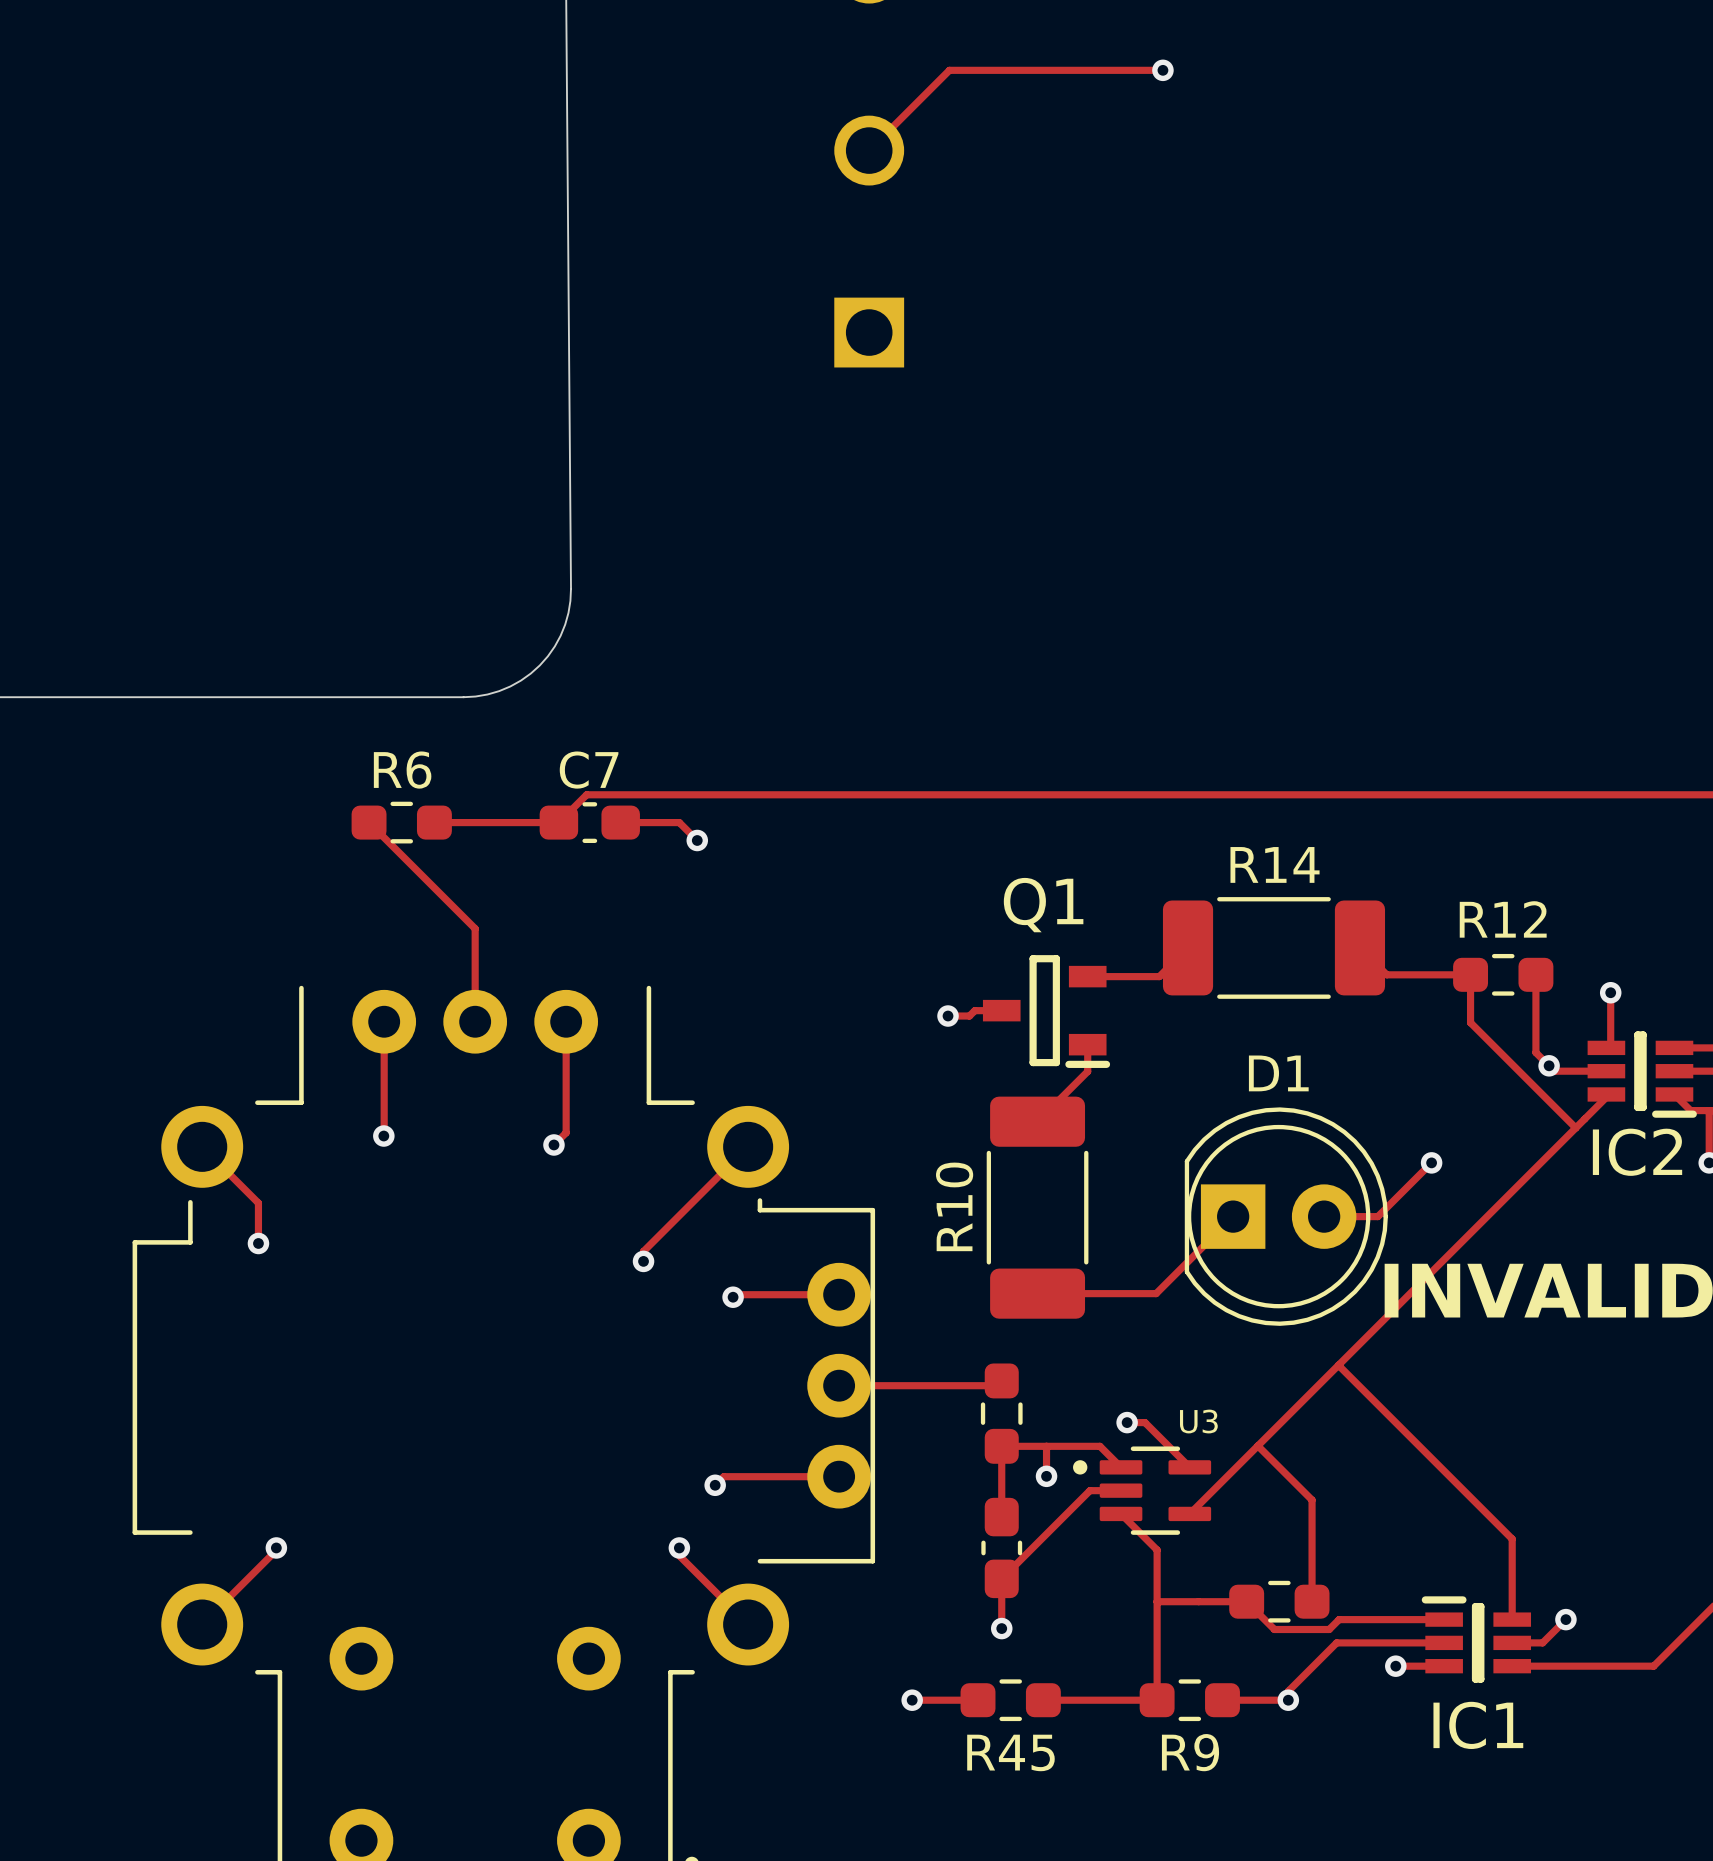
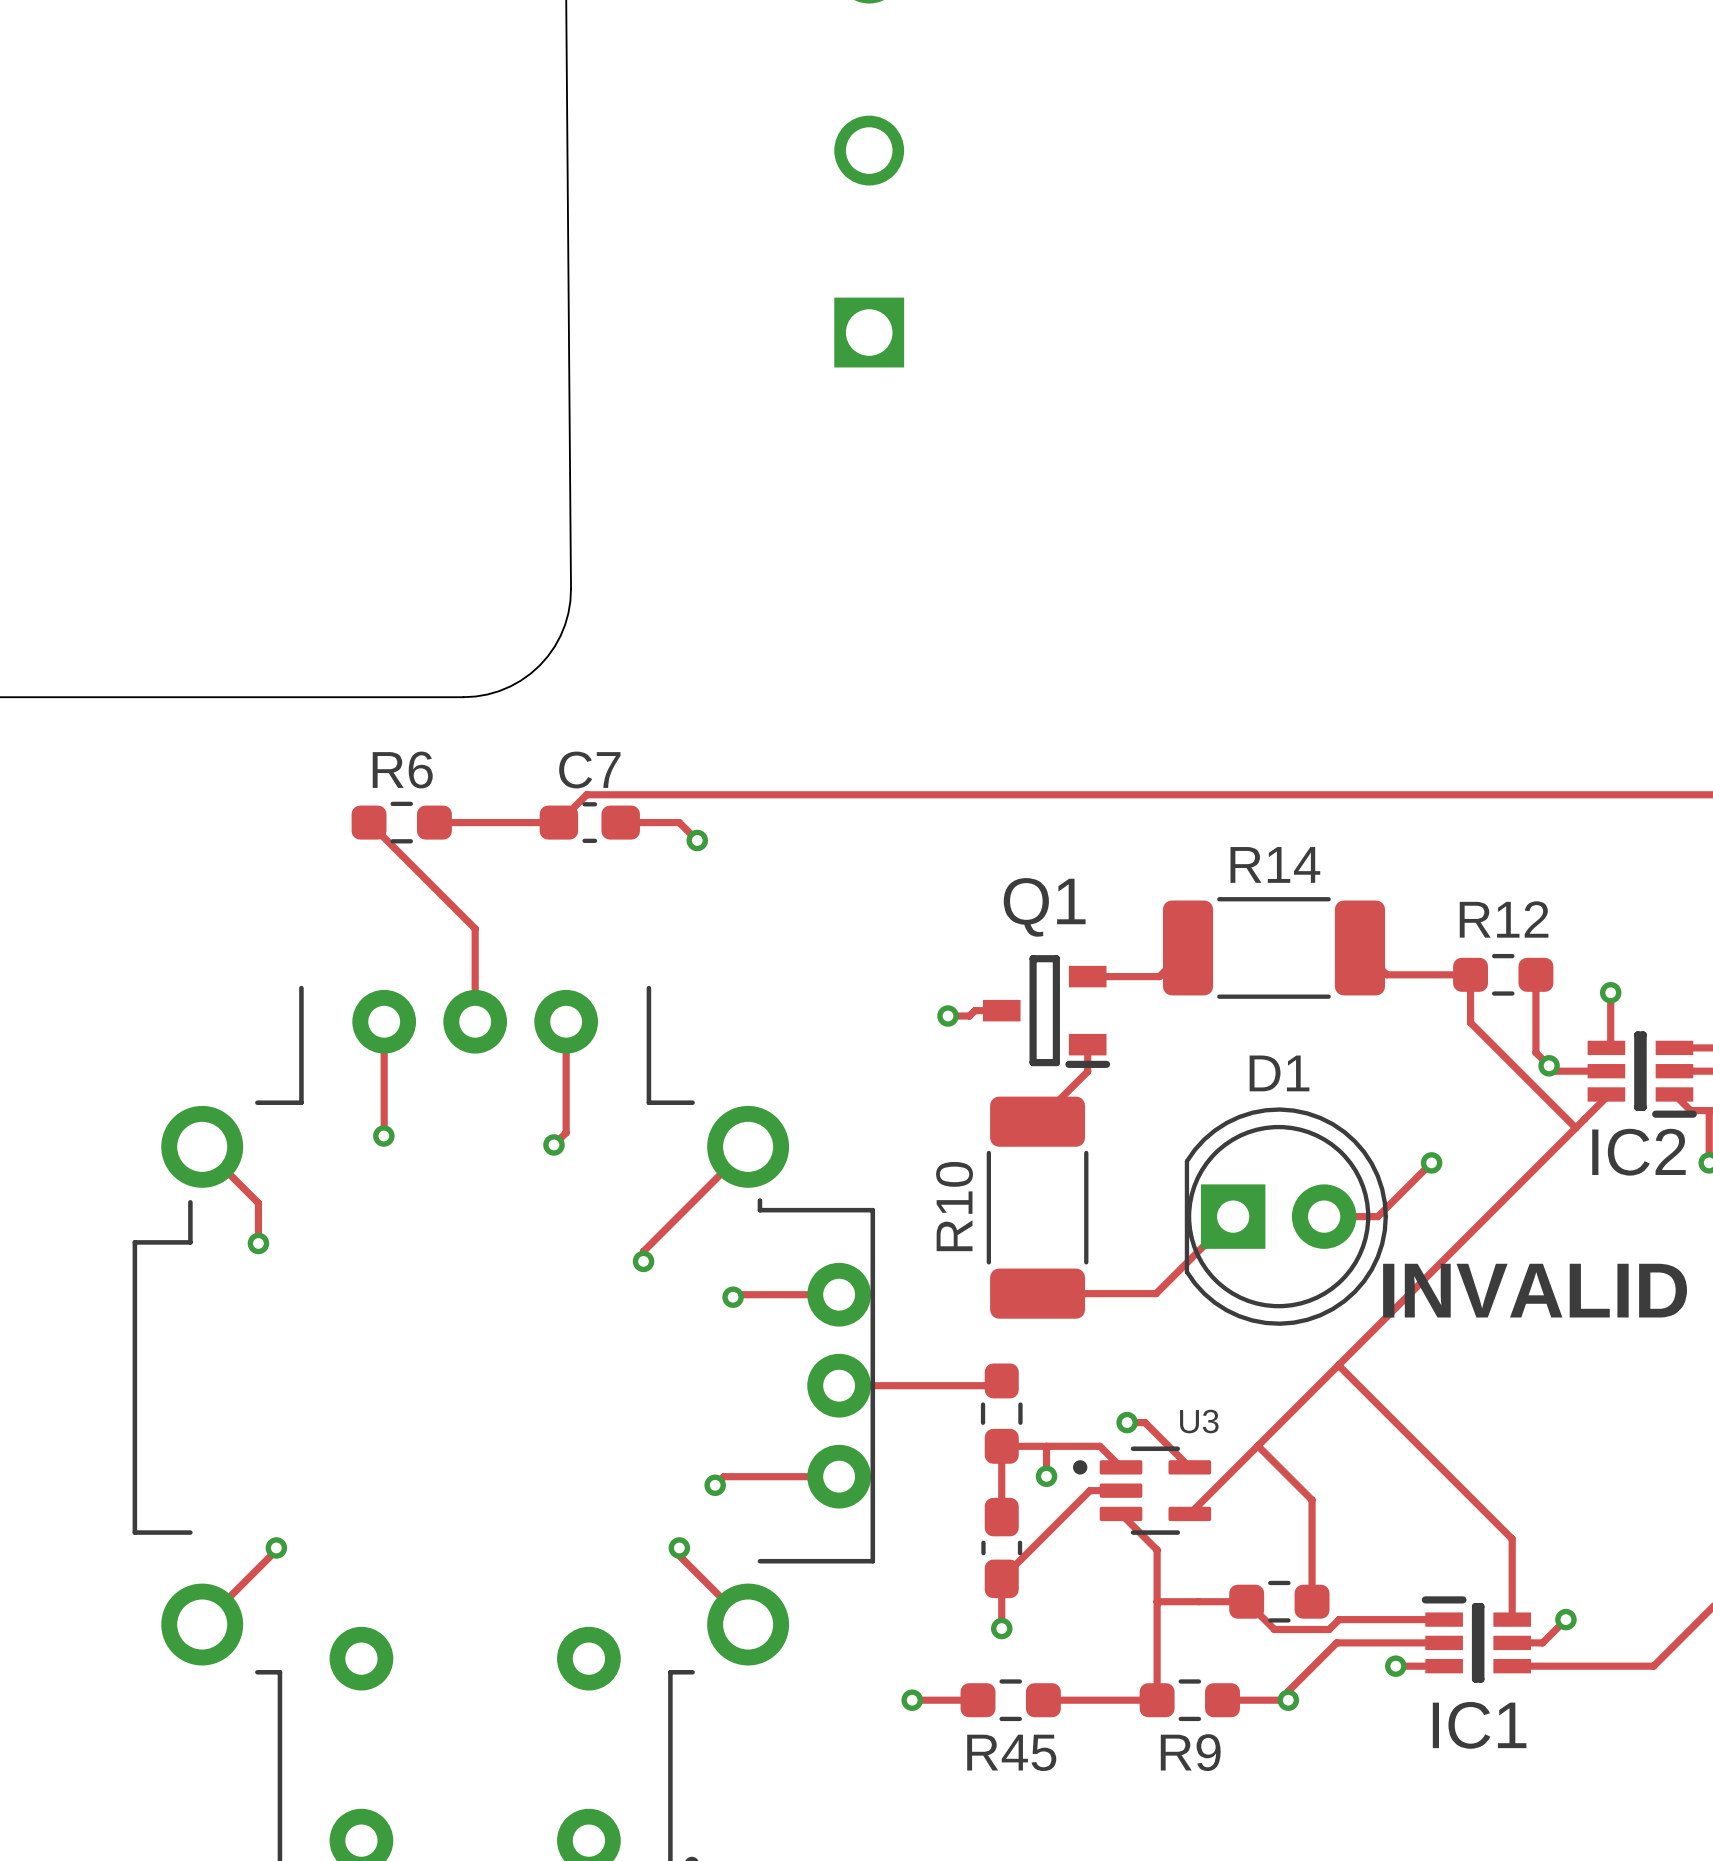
track: (1162, 70) (949, 70) (869, 150) -> none
via: (1162, 70) -> none

